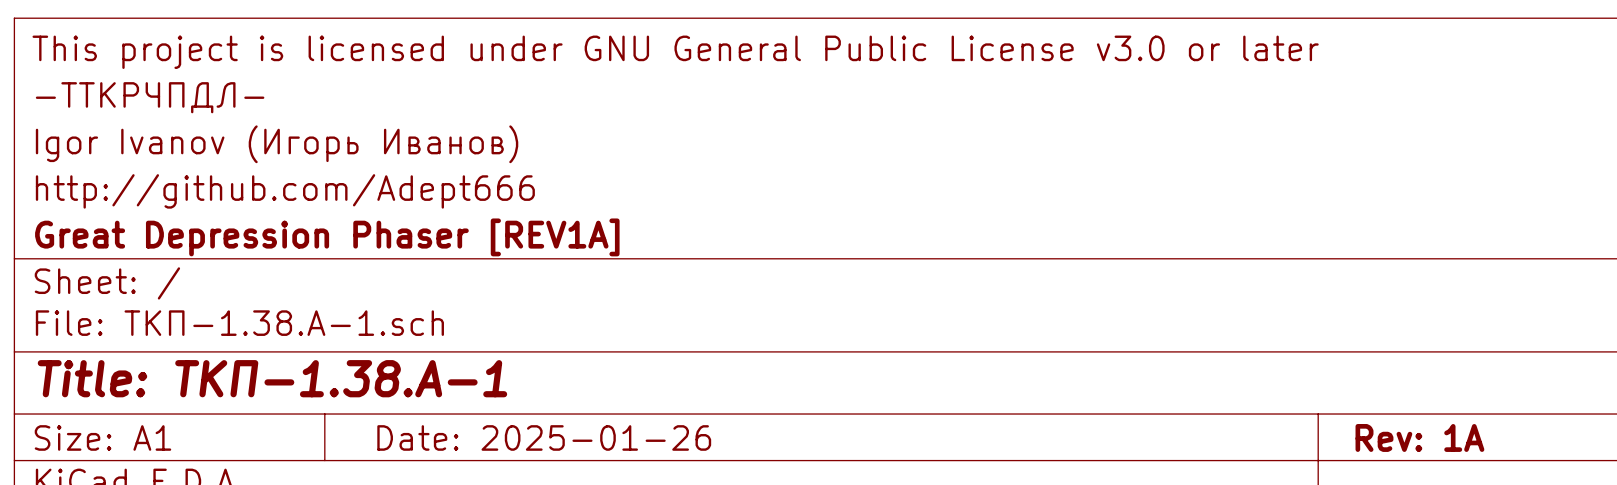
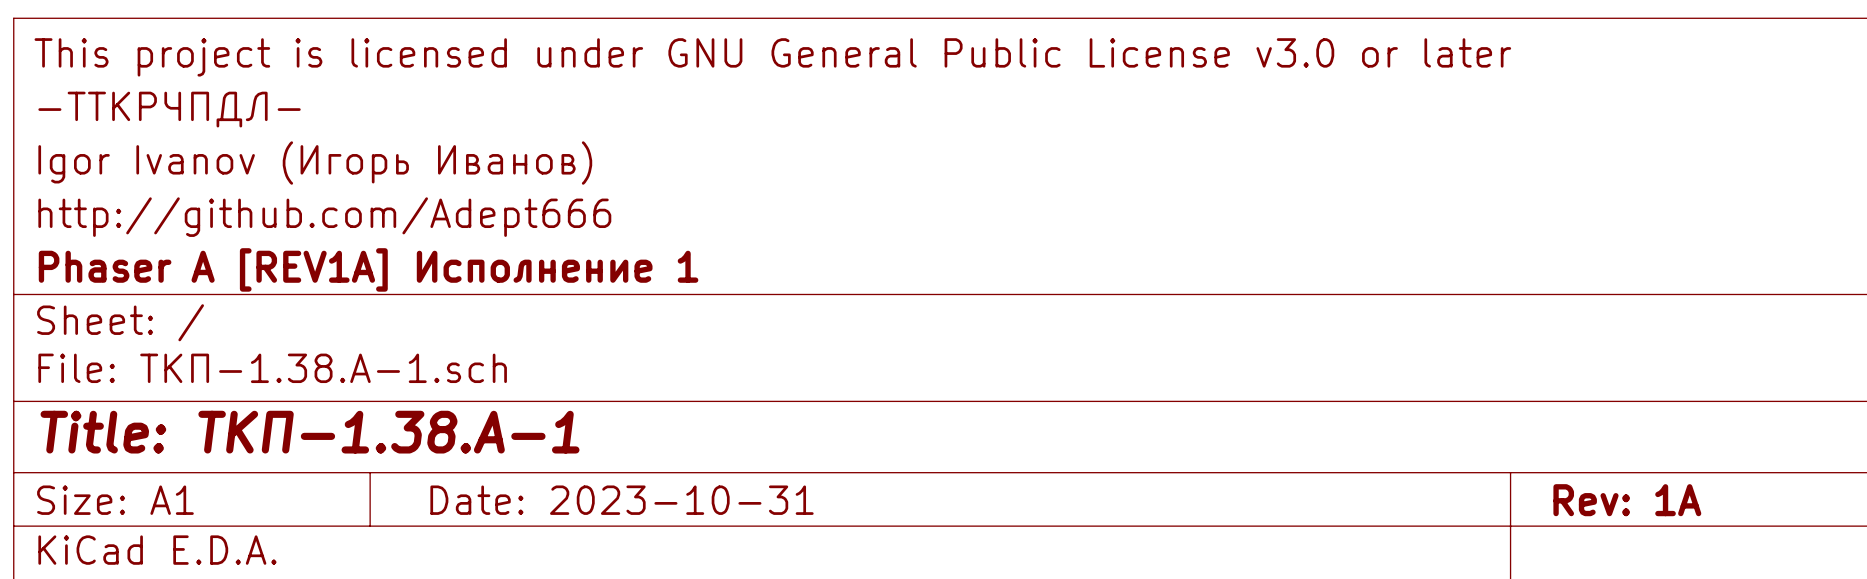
title block: Great Depression Phaser [REV1A] (327, 237) -> Phaser A [REV1A] Исполнение 1 (368, 269)
title block: Date: 2025-01-26 (544, 437) -> Date: 2023-10-31 (622, 500)

